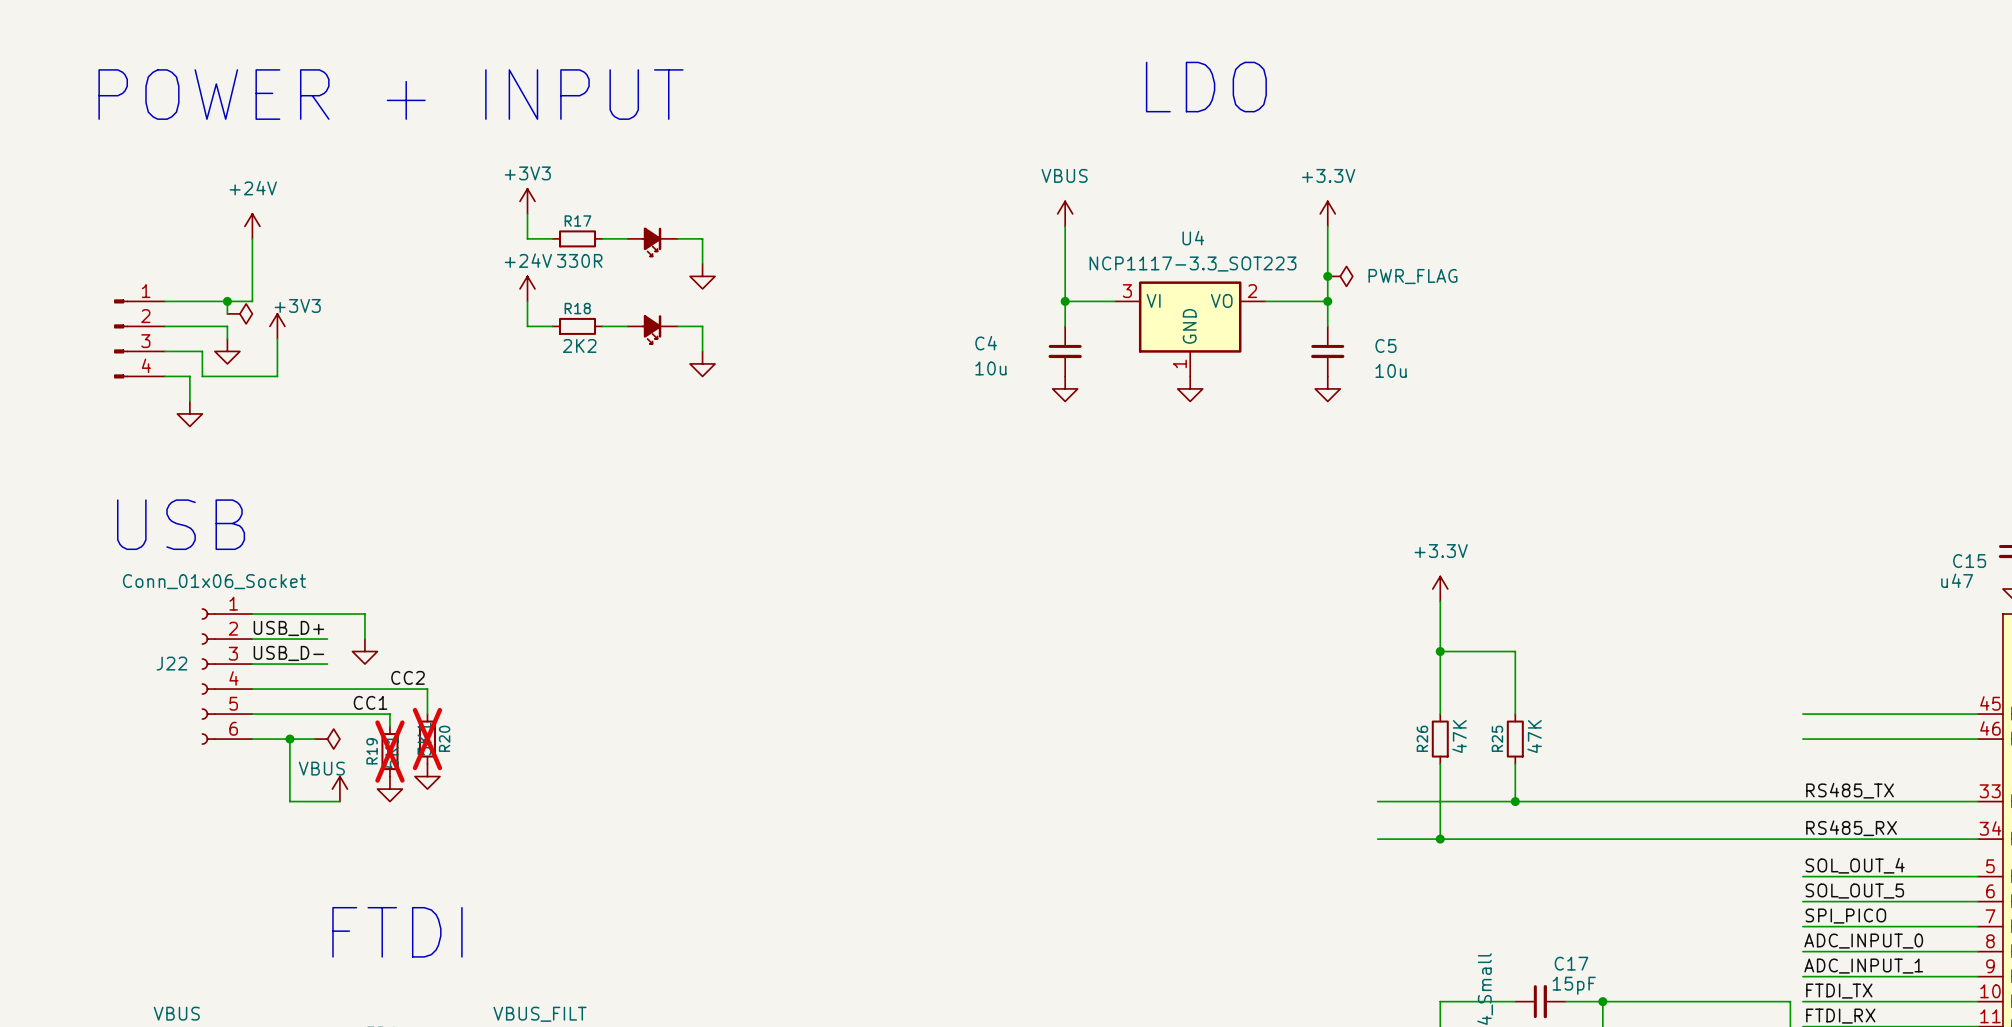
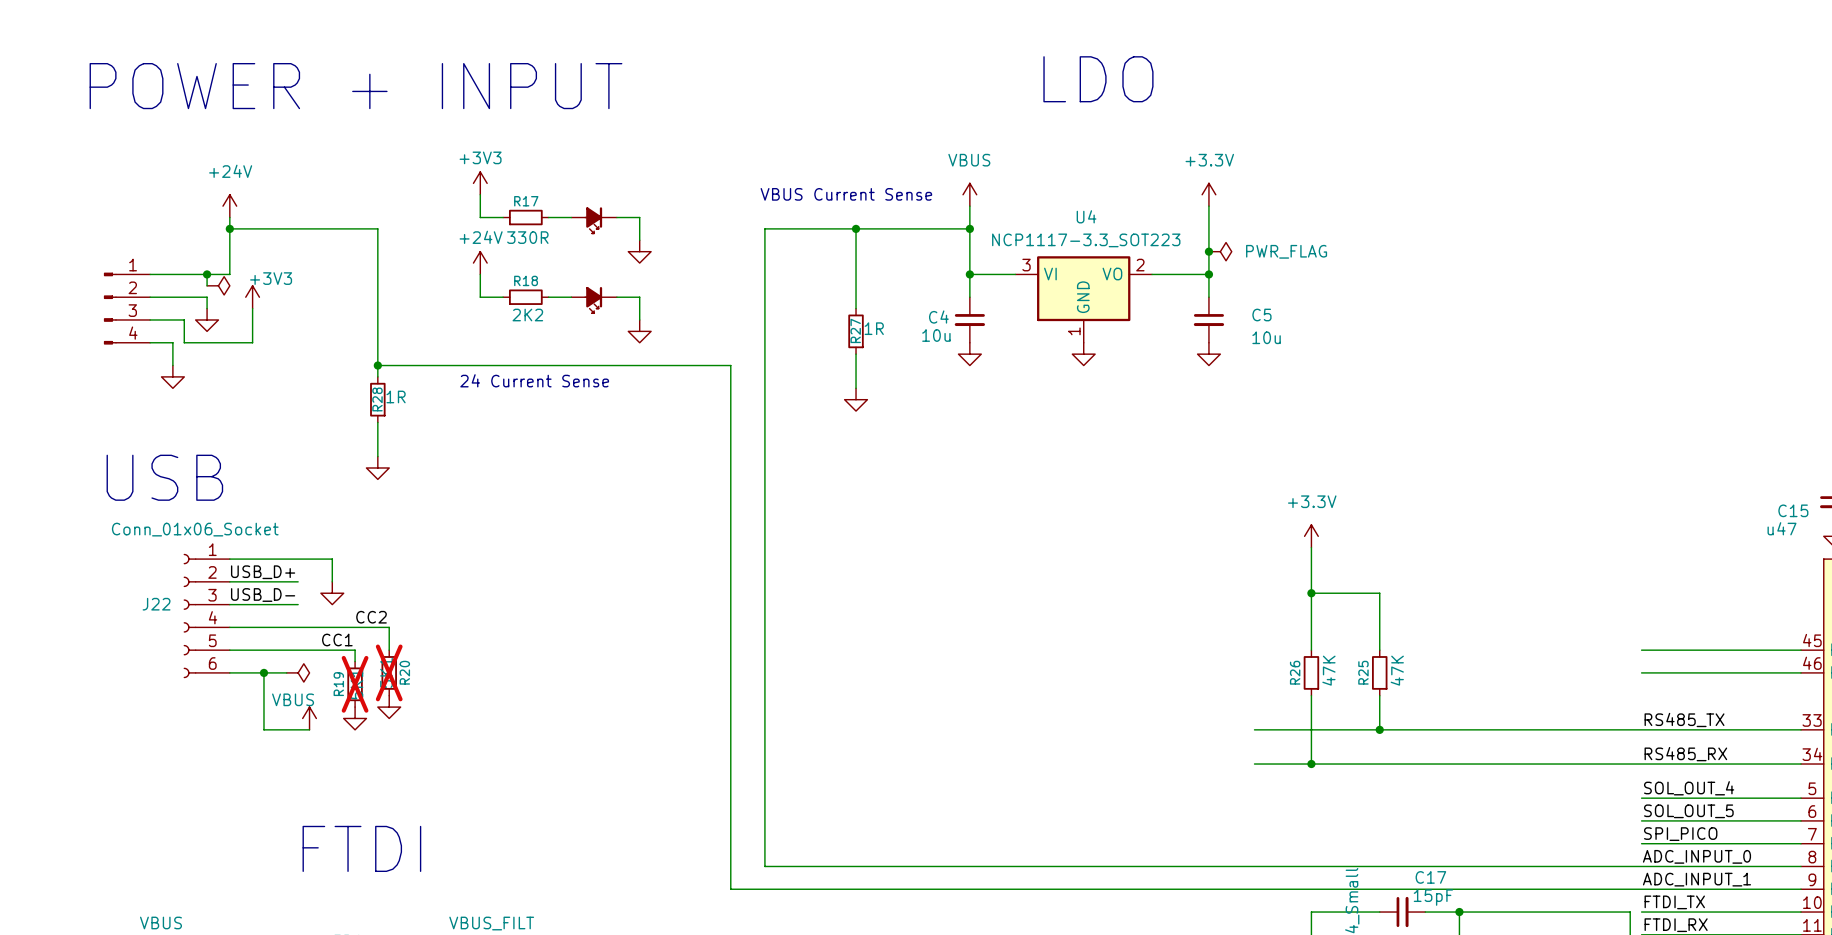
text: none -> VBUS Current Sense (846, 194)
wire: none -> (229, 228) (377, 228) (377, 376)
junction: none -> (229, 228)
wire: none -> (856, 228) (856, 308)
junction: none -> (856, 228)
wire: none -> (969, 228) (764, 228) (764, 866) (1641, 866)
junction: none -> (969, 228)
C4 name position: C4 (986, 343) -> C4 (938, 317)
R27: none -> 1R (856, 331)
C4 value position: 10u (990, 368) -> 10u (936, 335)
wire: none -> (856, 354) (856, 388)
wire: none -> (377, 365) (730, 365) (730, 889) (1641, 889)
junction: none -> (377, 365)
text: none -> 24 Current Sense (534, 380)
R28: none -> 1R (377, 399)
power symbol: none -> (856, 399)
wire: none -> (377, 422) (377, 456)
power symbol: none -> (377, 467)

